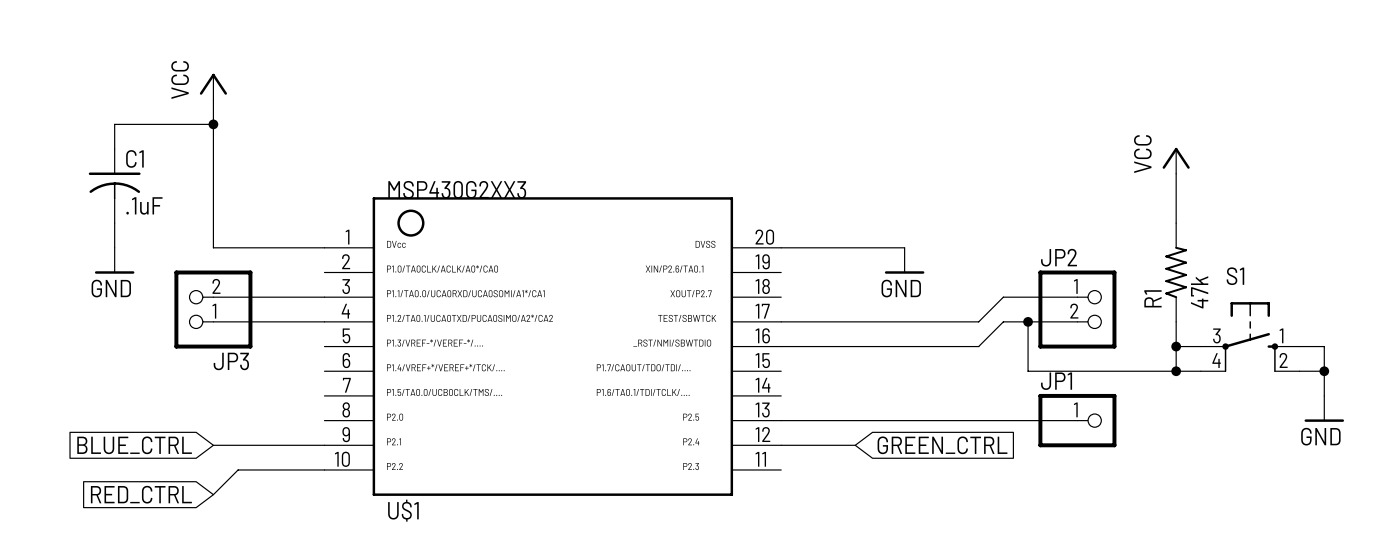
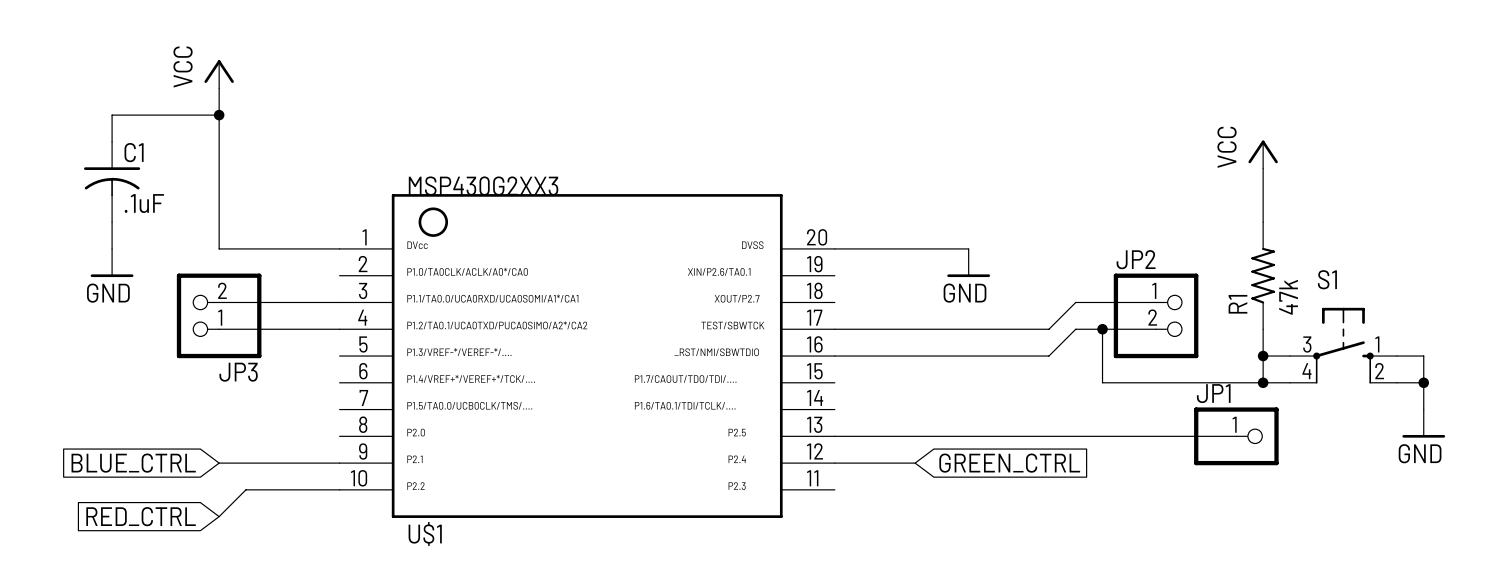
wire: none -> (1156, 436) (1236, 436)
JP1 position: (1077, 420) -> (1236, 436)

